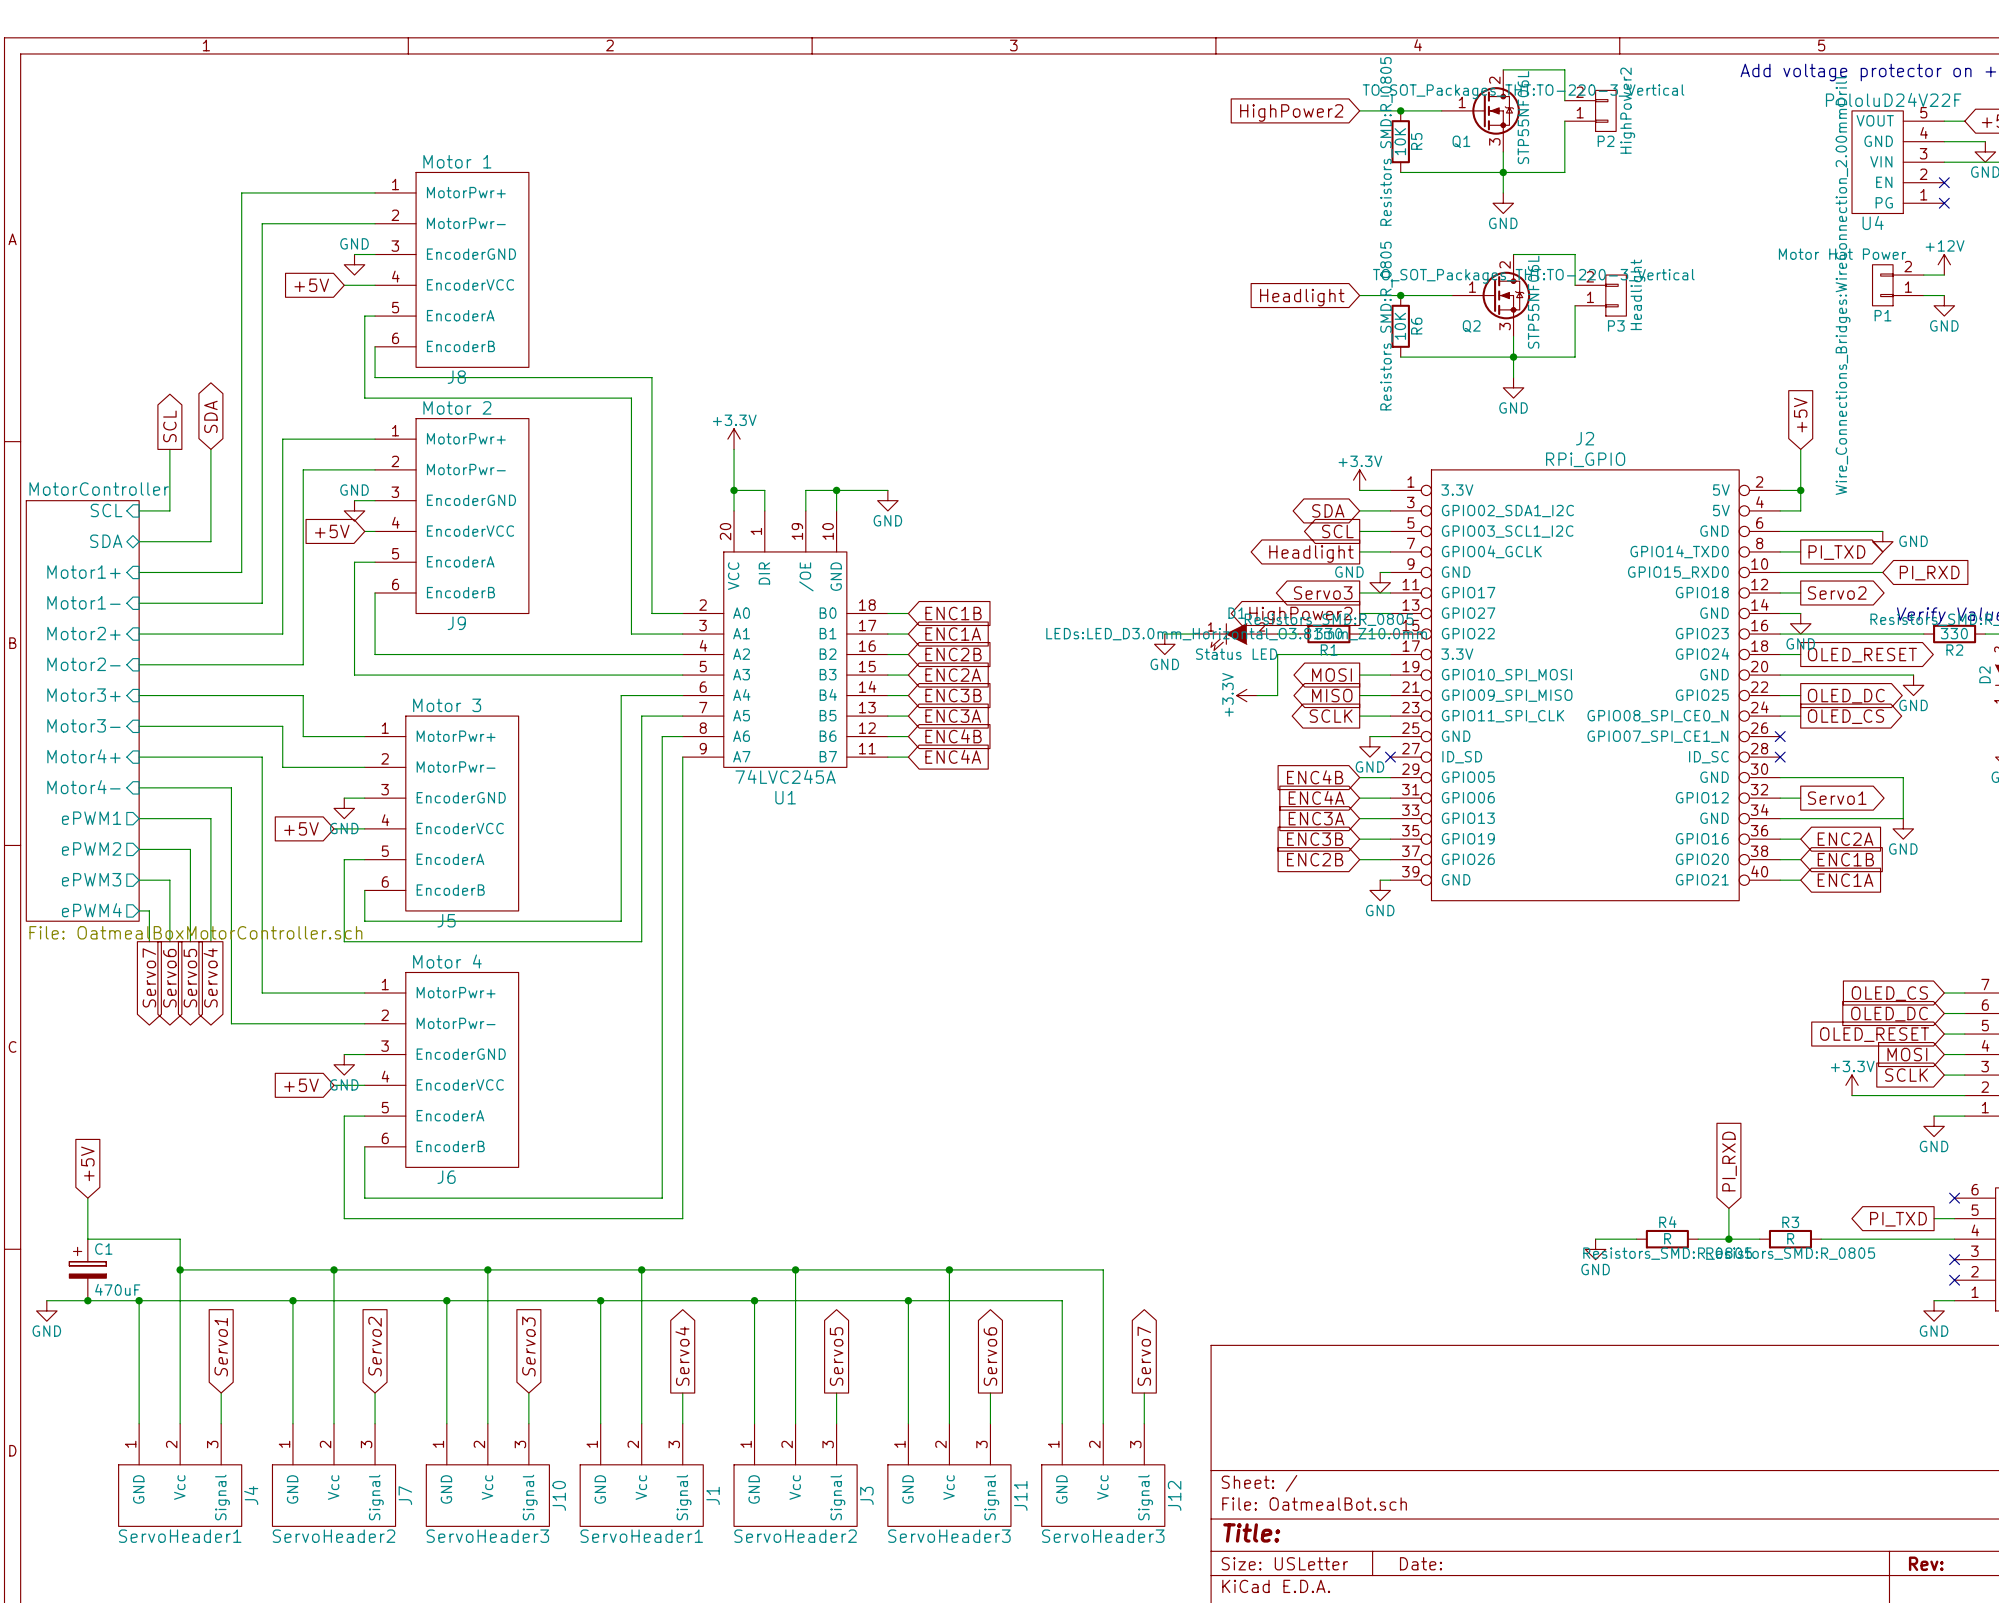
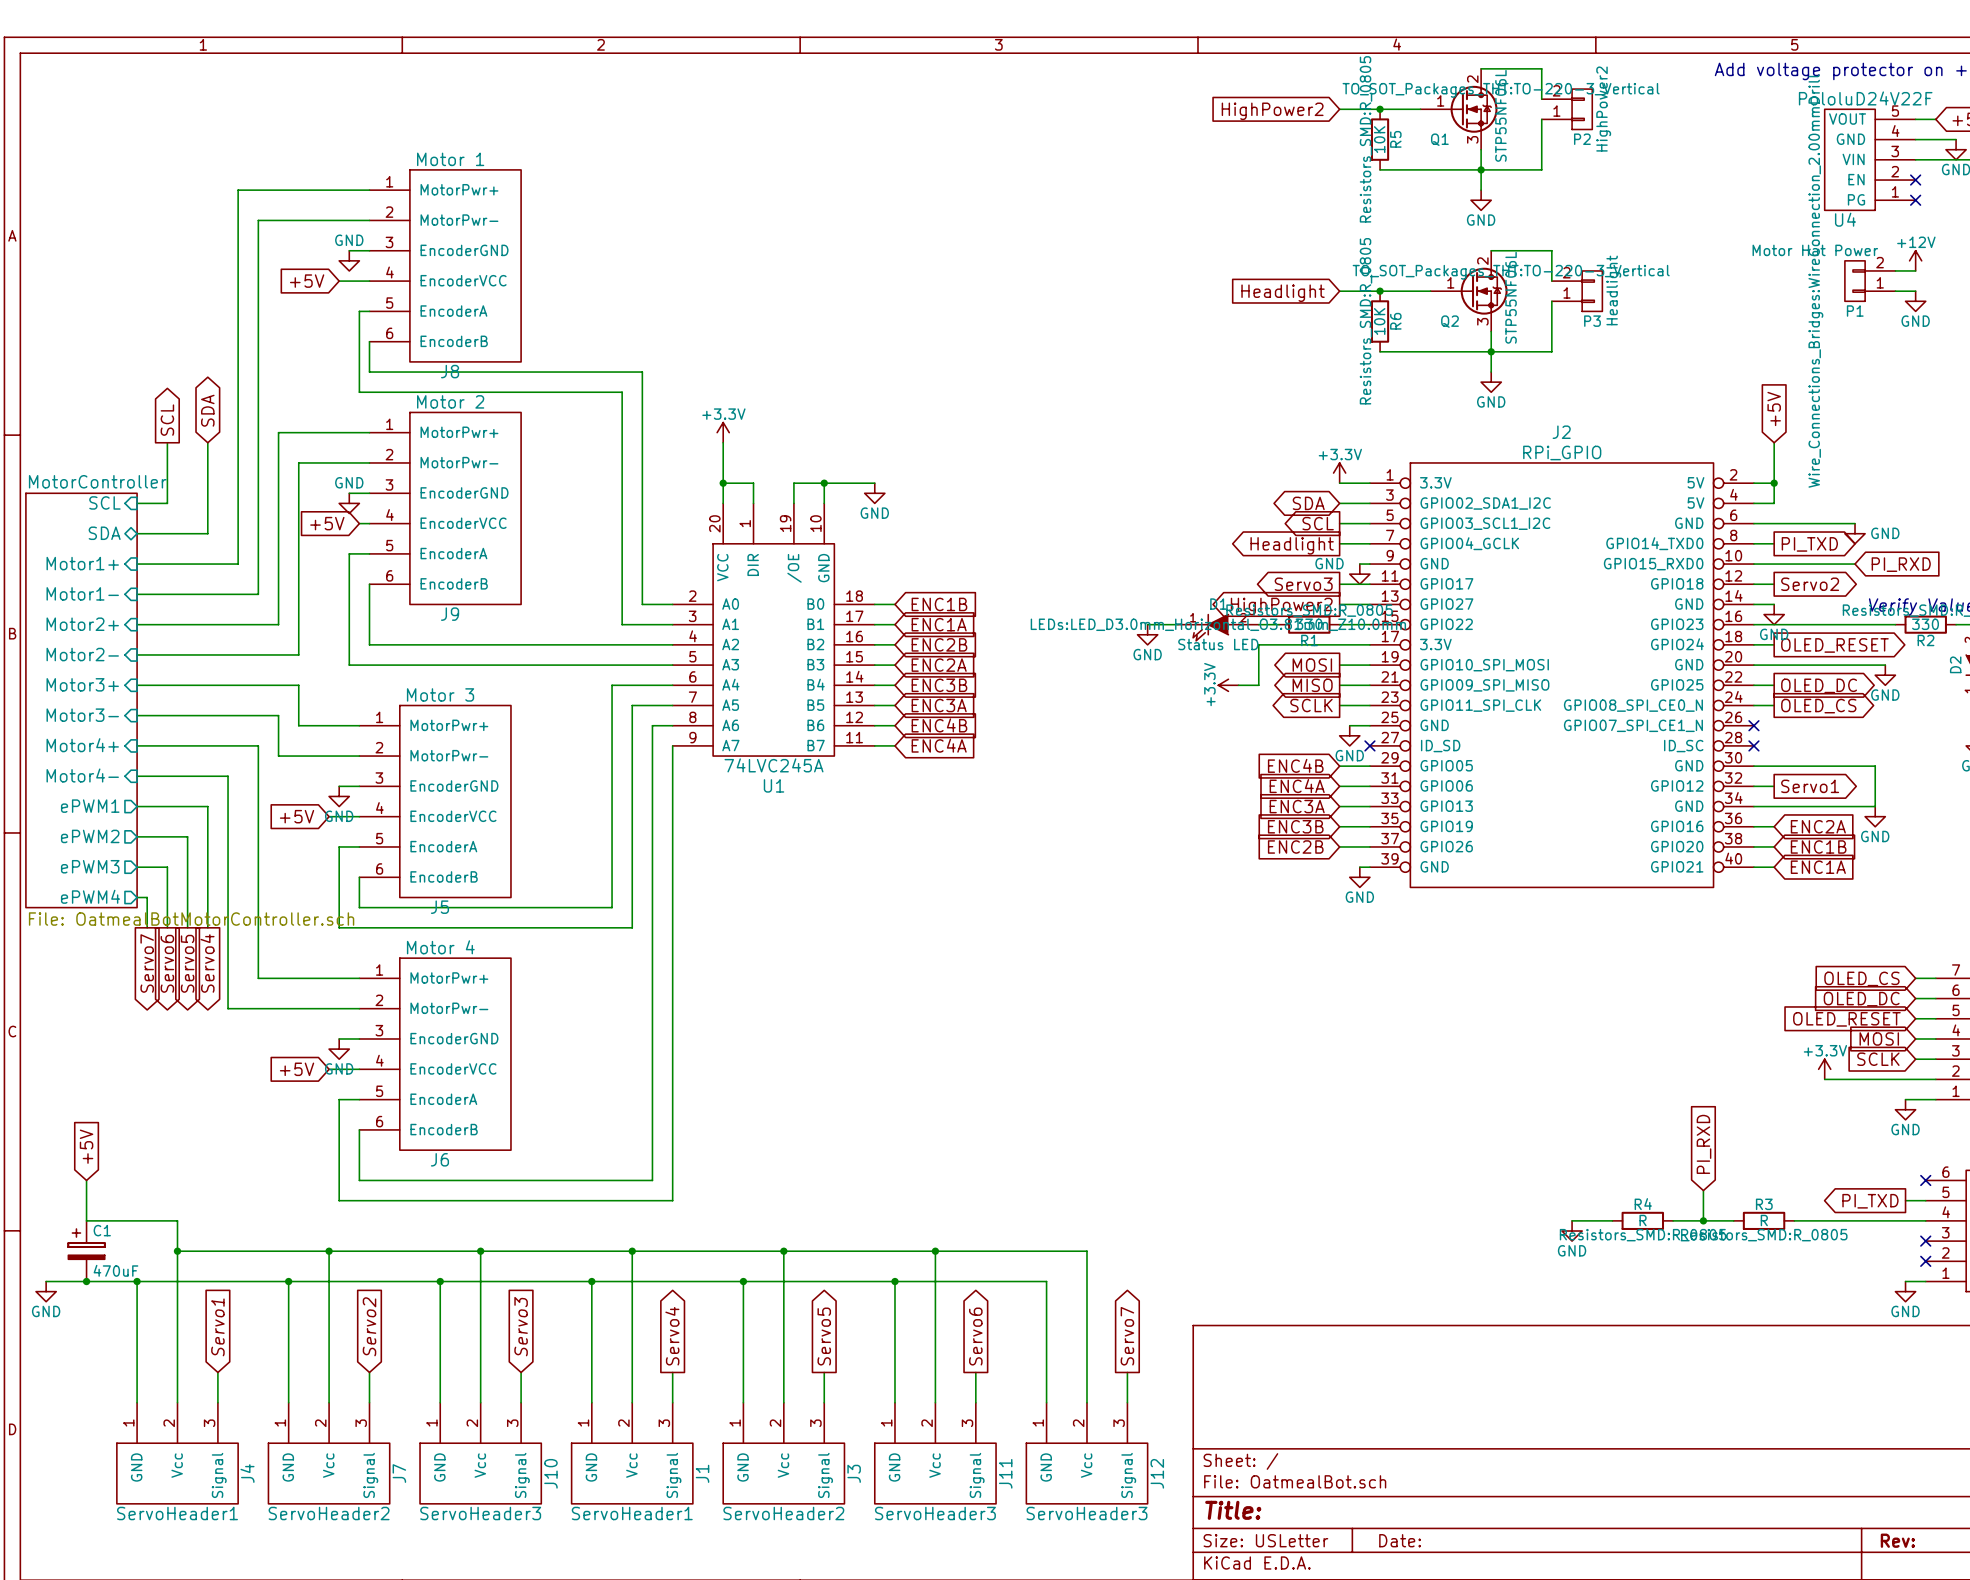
sheet MotorController value: File: OatmealBoxMotorController.sch (195, 932) -> File: OatmealBotMotorController.sch (191, 919)

